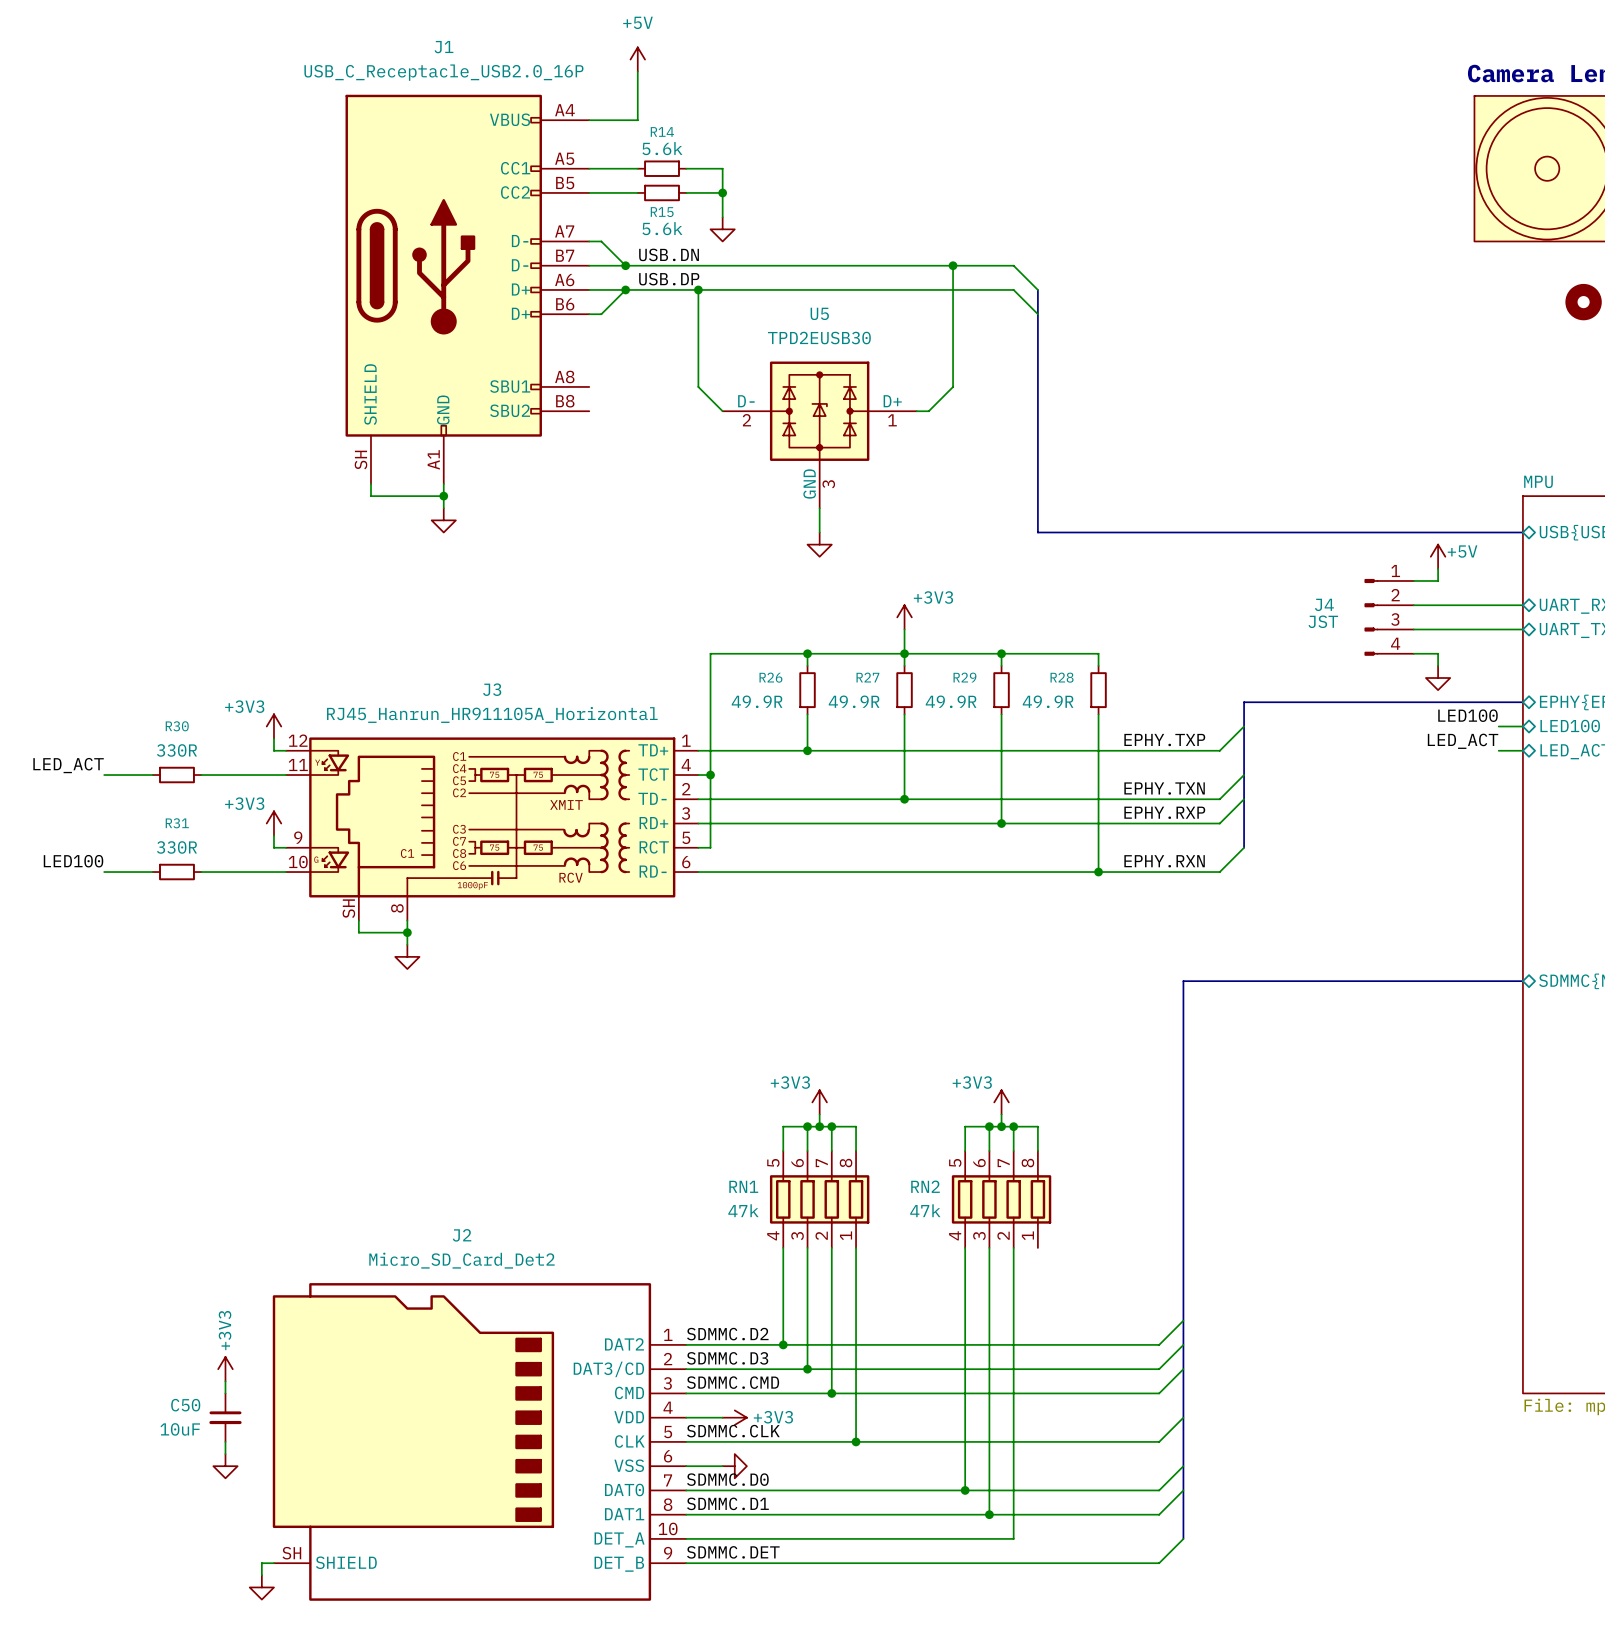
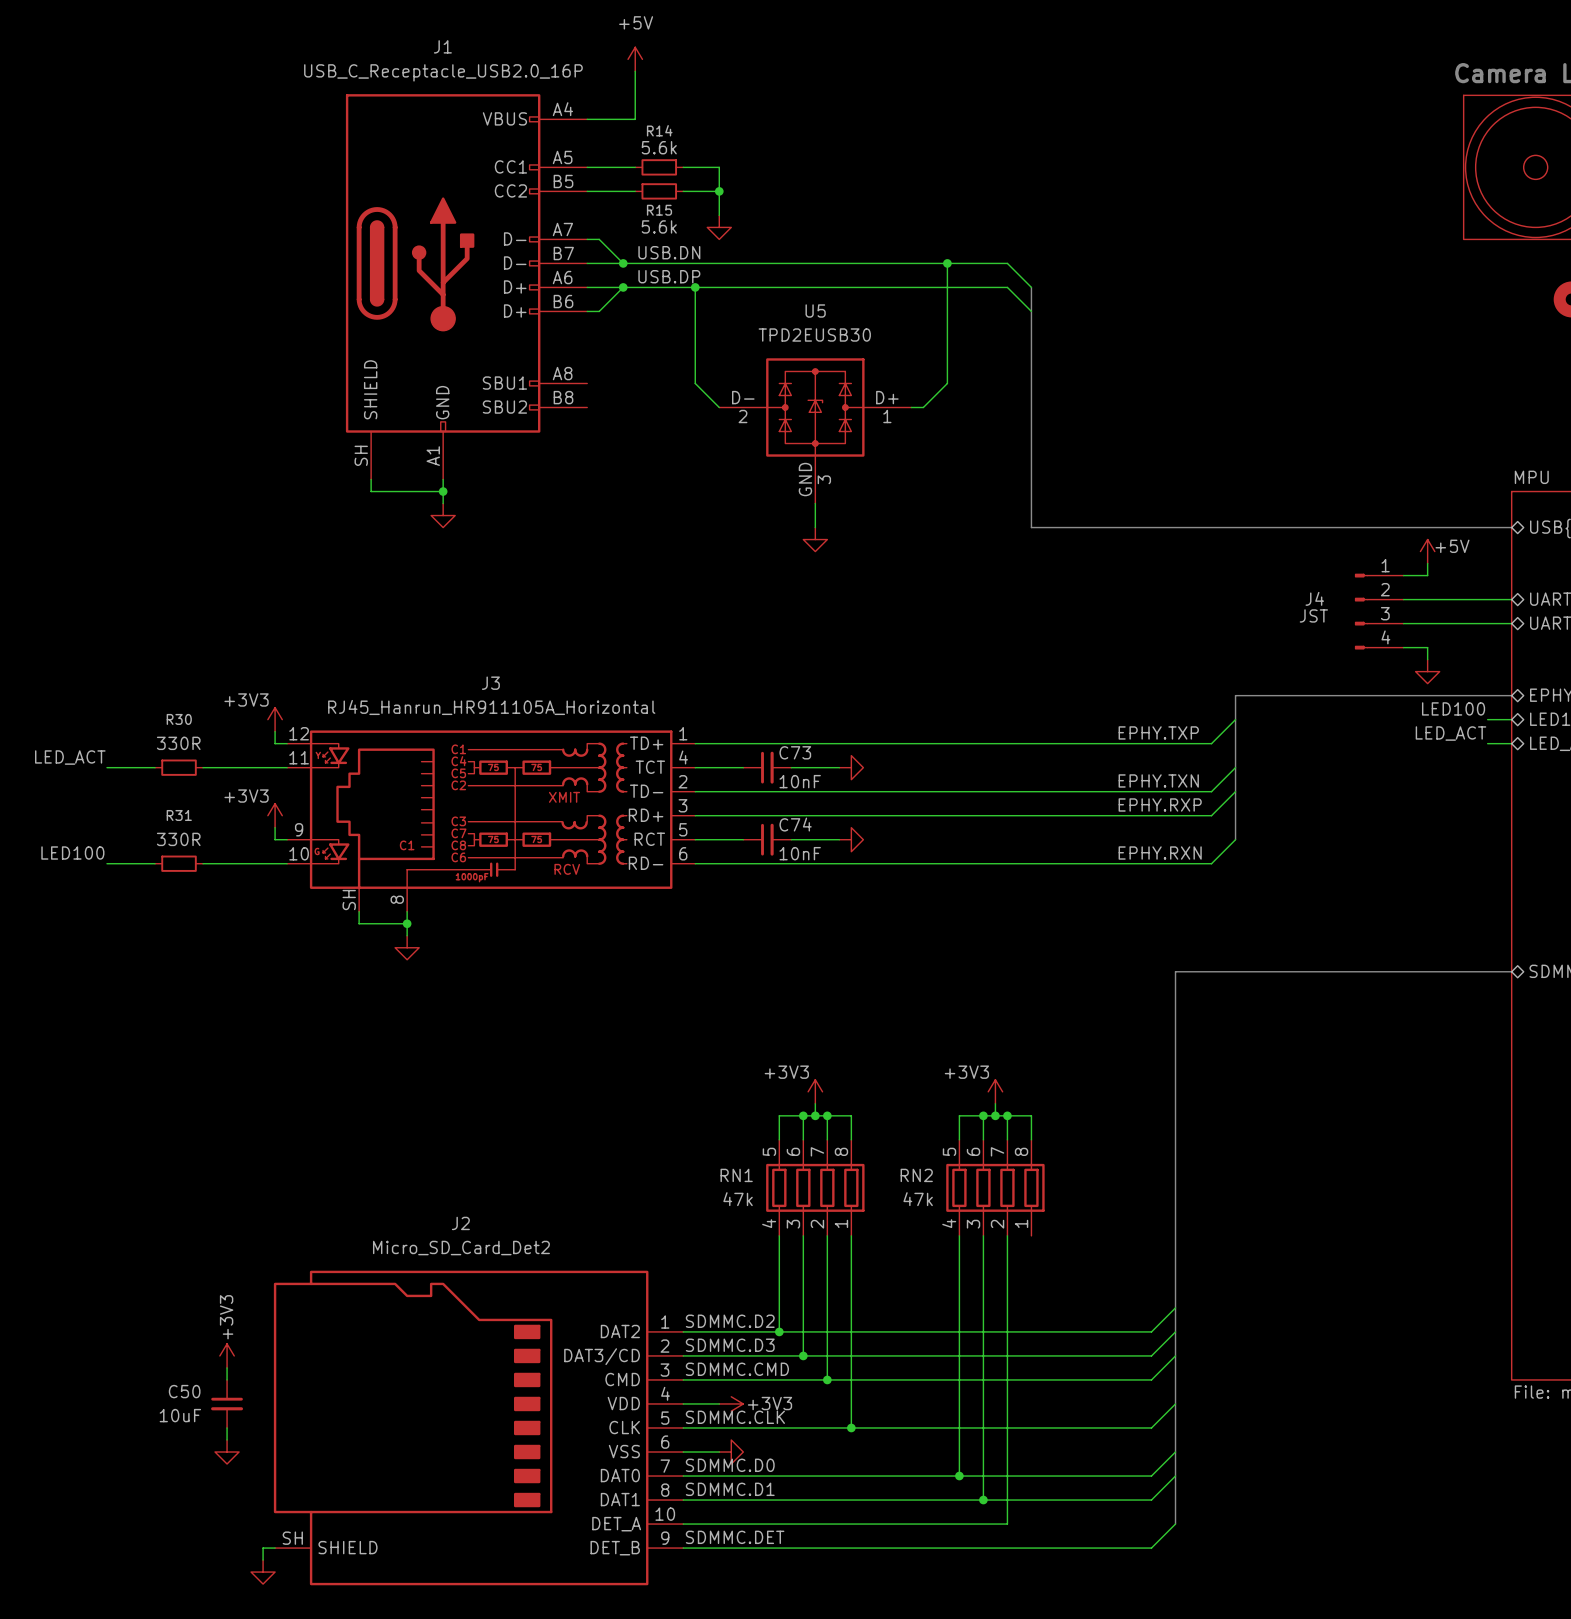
power symbol: +3V3 (904, 617) -> none
wire: (904, 629) (904, 665) -> none
wire: (807, 653) (807, 665) -> none
junction: (807, 653) -> none
junction: (904, 653) -> none
wire: (1001, 653) (1001, 665) -> none
junction: (1001, 653) -> none
wire: (1098, 665) (1098, 653) (710, 653) (710, 847) -> (743, 839) (707, 839)
R26: 49.9R (807, 690) -> none
R27: 49.9R (904, 690) -> none
R29: 49.9R (1001, 690) -> none
R28: 49.9R (1098, 690) -> none
wire: (807, 714) (807, 750) -> none
wire: (904, 714) (904, 799) -> none
wire: (1001, 714) (1001, 823) -> none
wire: (1098, 714) (1098, 872) -> none
junction: (807, 750) -> none
wire: none -> (707, 767) (743, 767)
junction: (710, 775) -> none
C73: none -> 10nF (767, 767)
wire: none -> (791, 767) (839, 767)
power symbol: none -> (851, 767)
junction: (904, 799) -> none
junction: (1001, 823) -> none
C74: none -> 10nF (767, 839)
wire: none -> (791, 839) (839, 839)
power symbol: none -> (851, 839)
junction: (1098, 872) -> none

